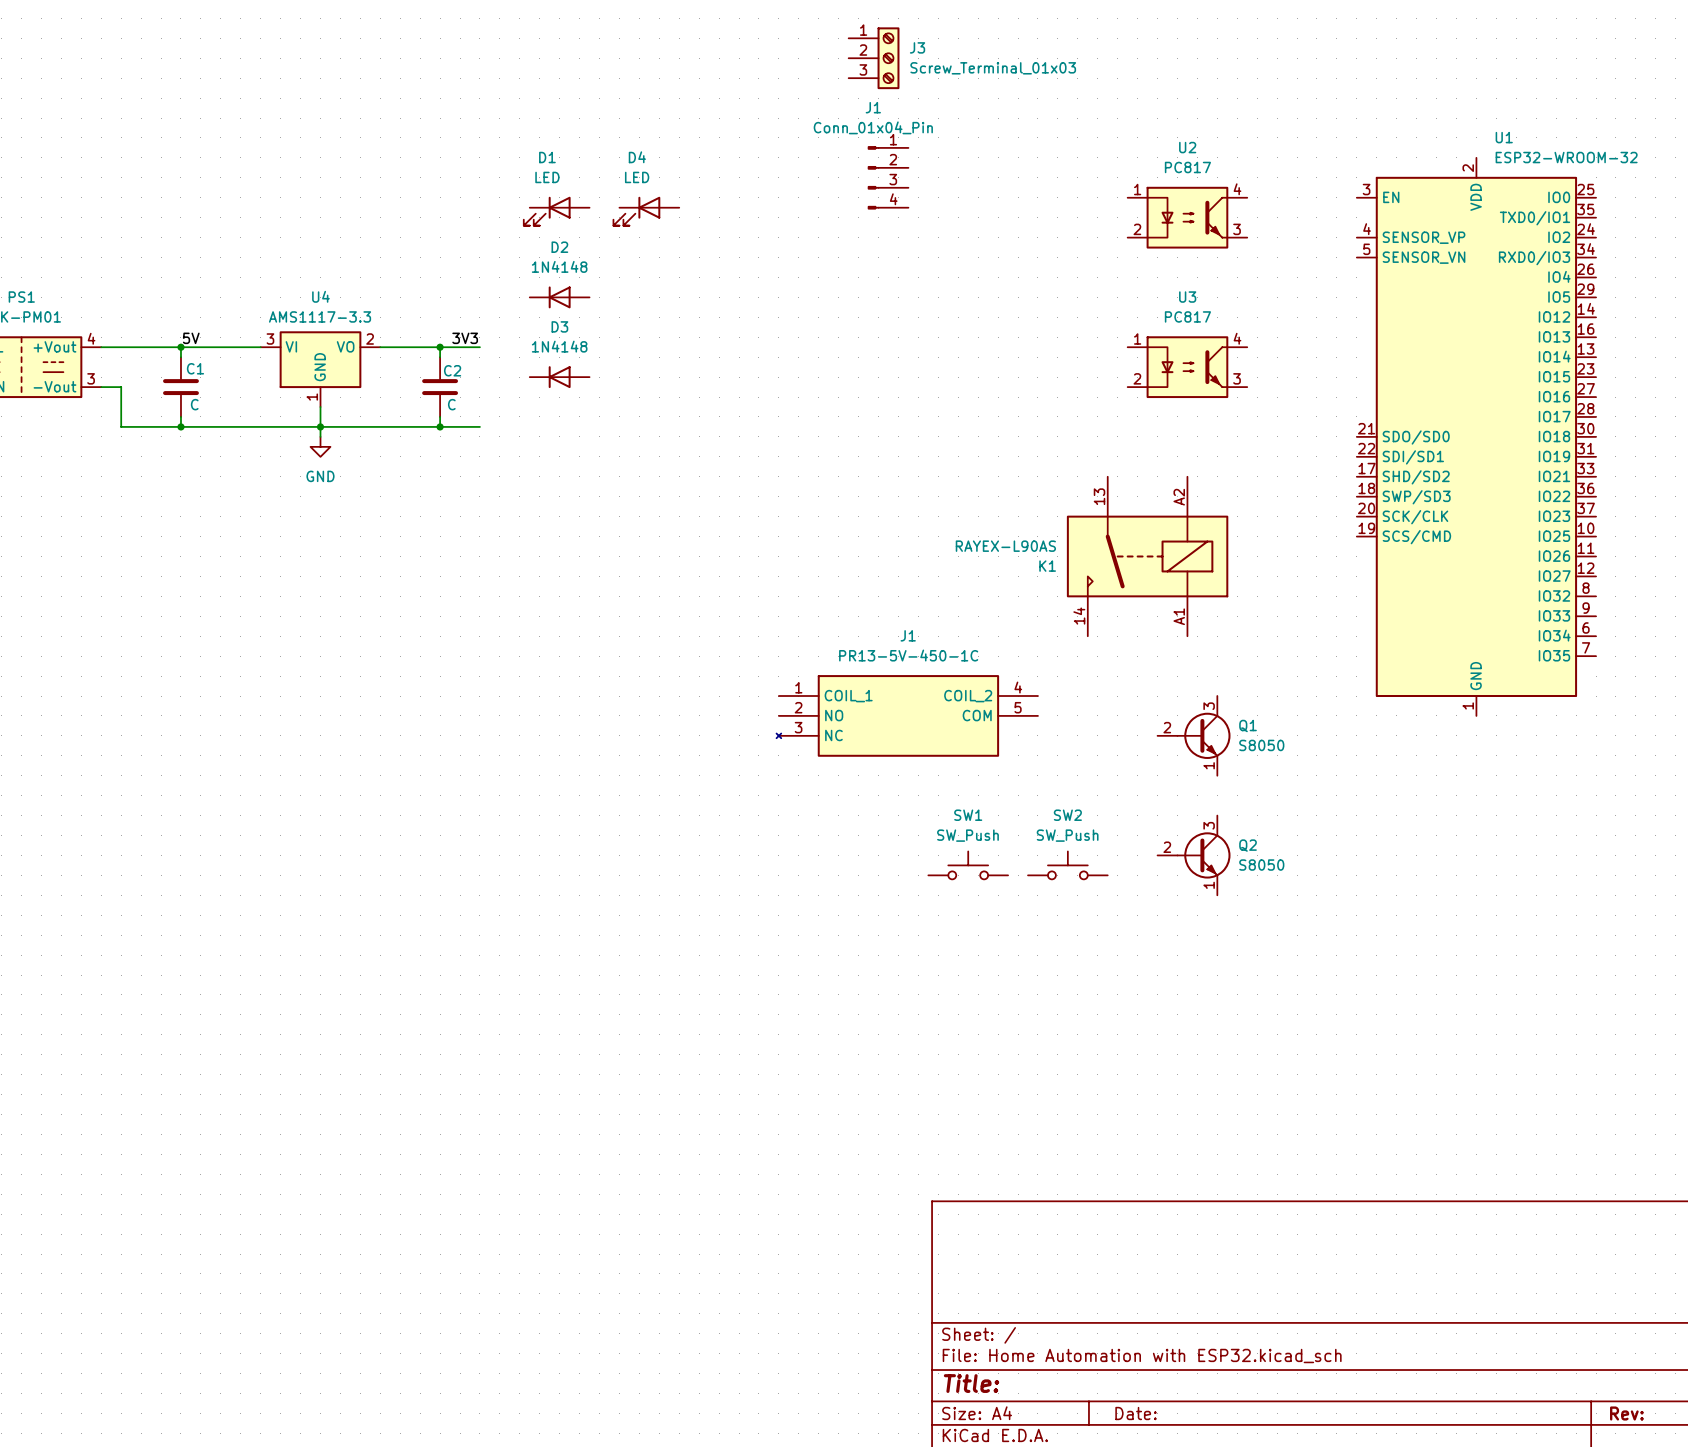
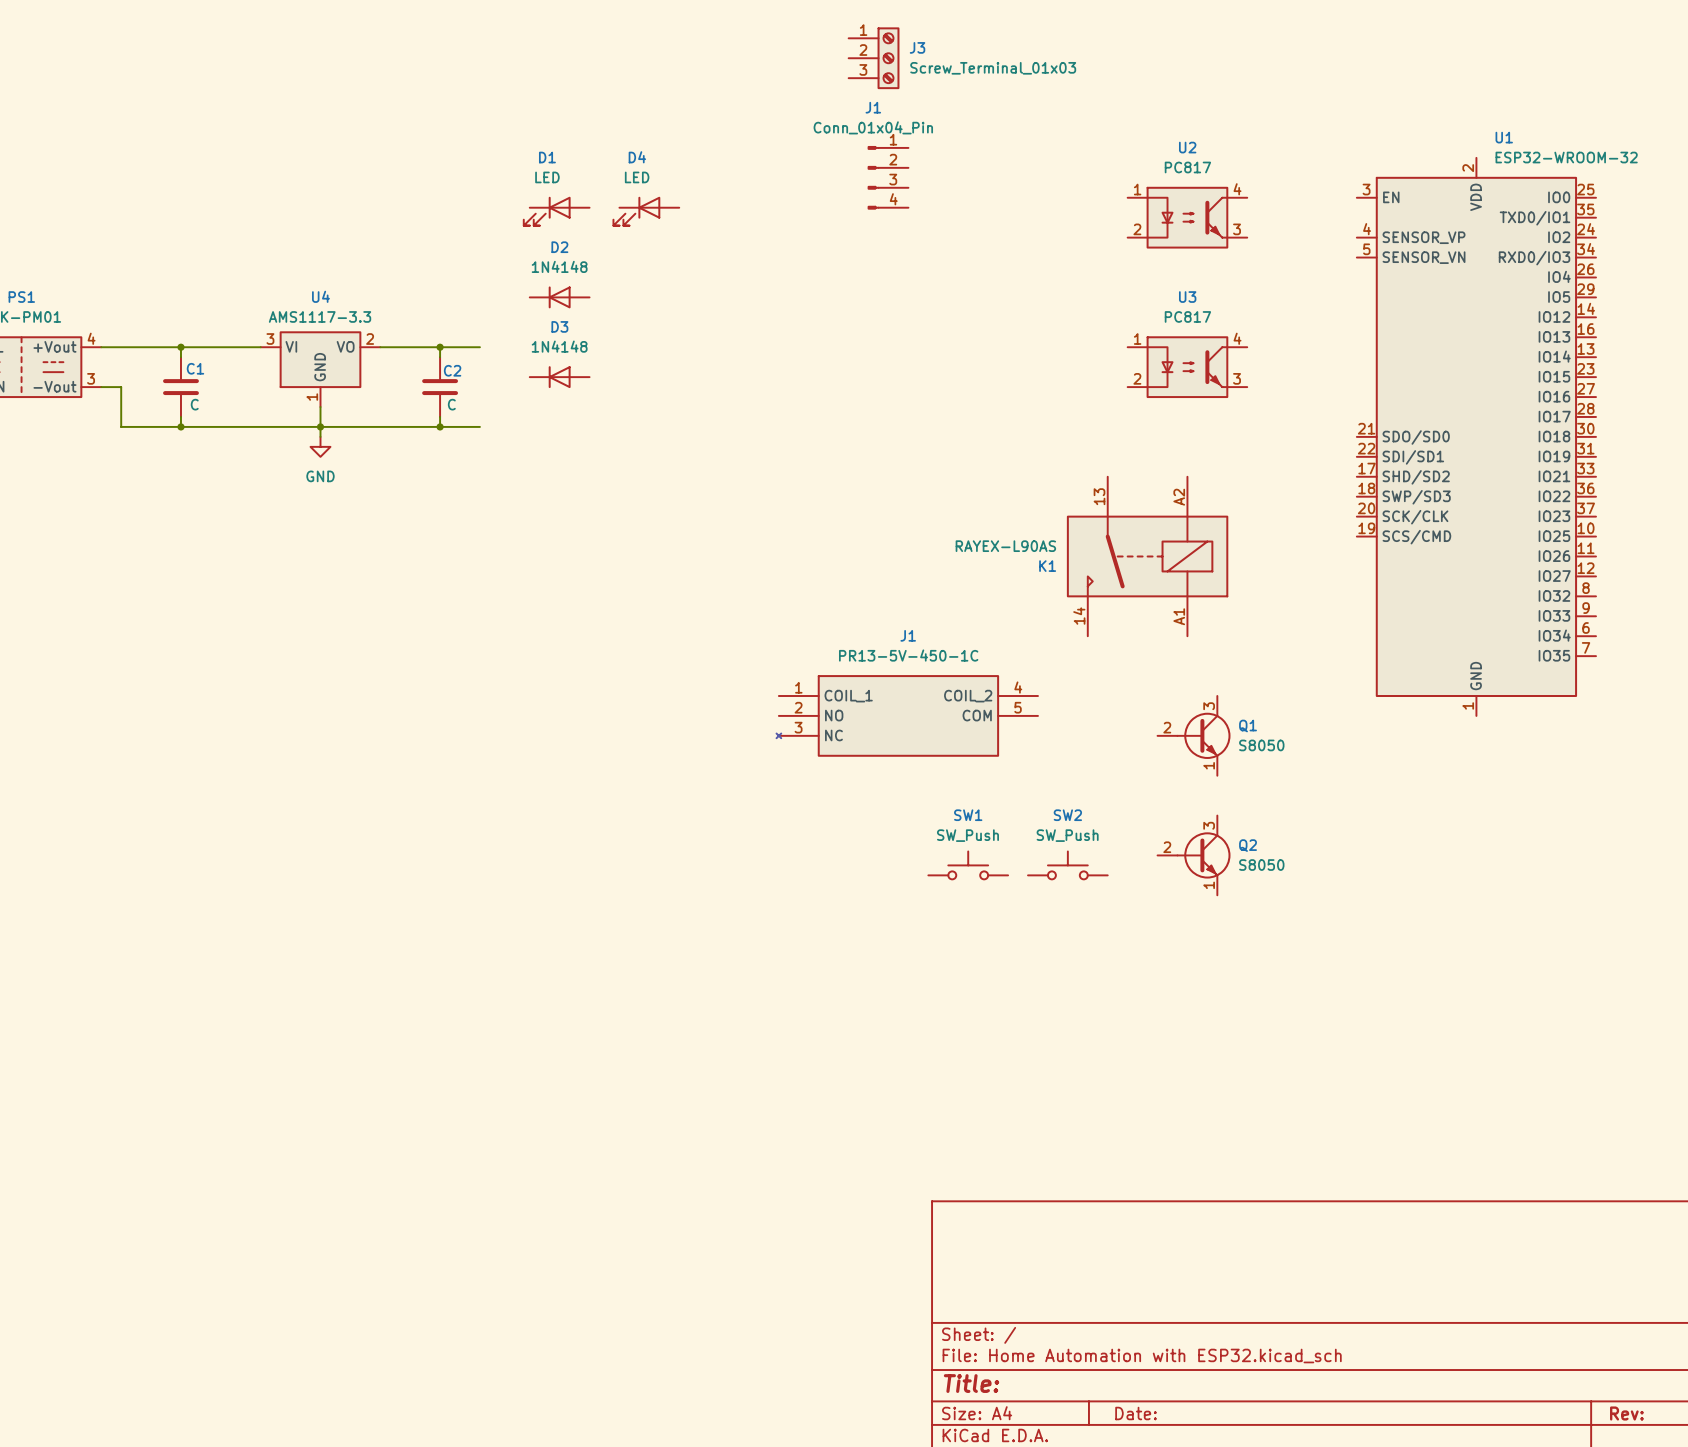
label: 5V (191, 338) -> none
label: 3V3 (465, 338) -> none

